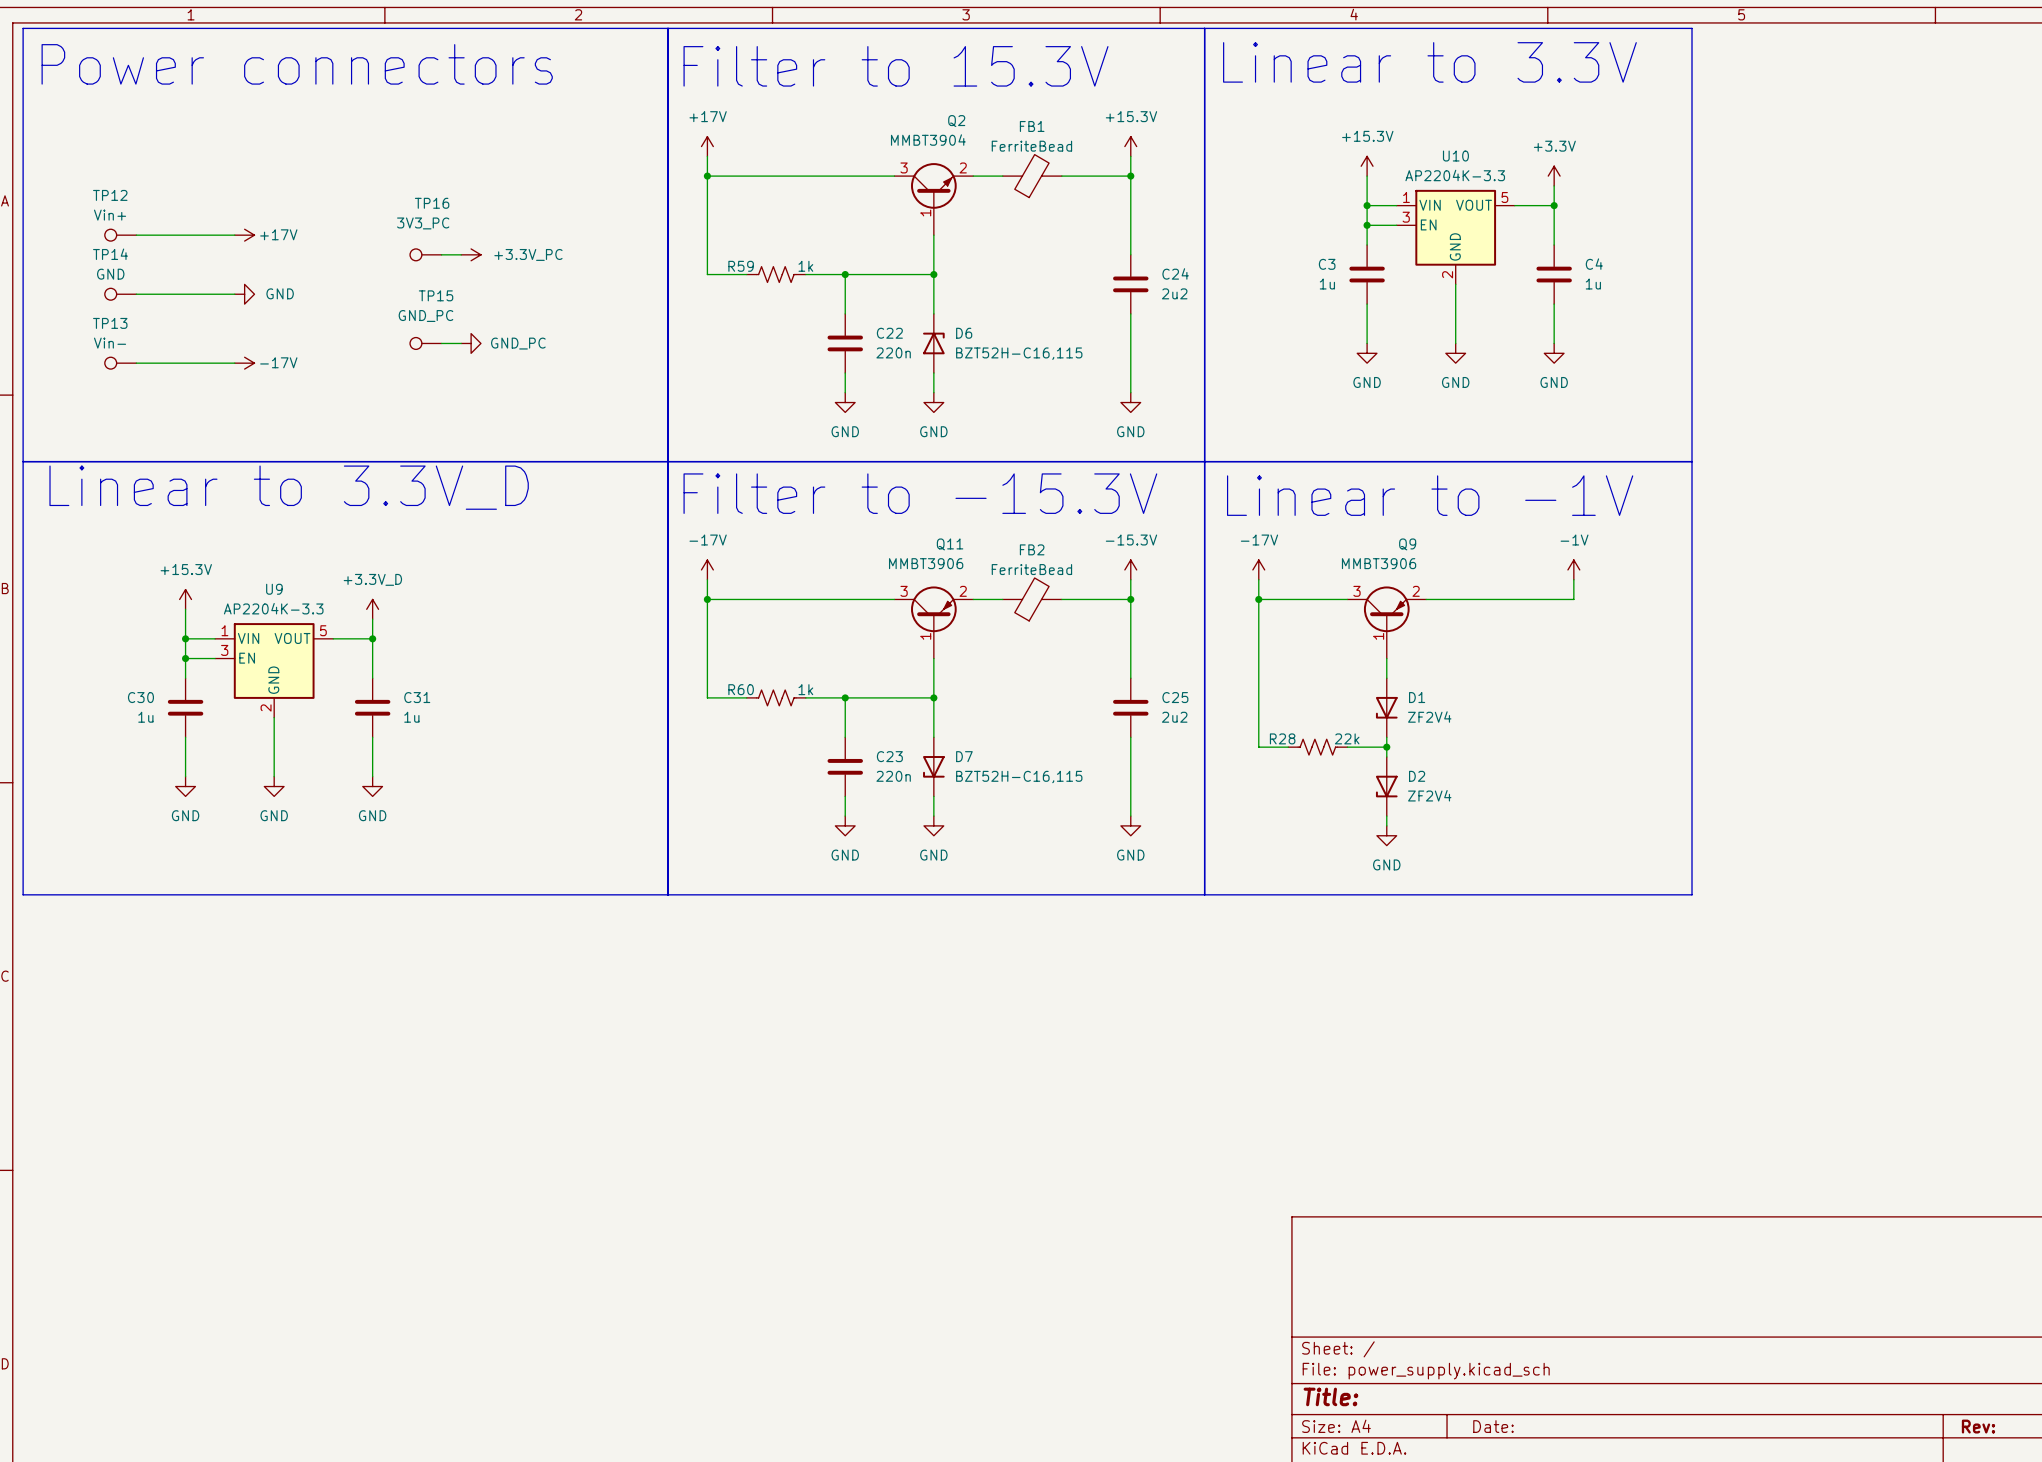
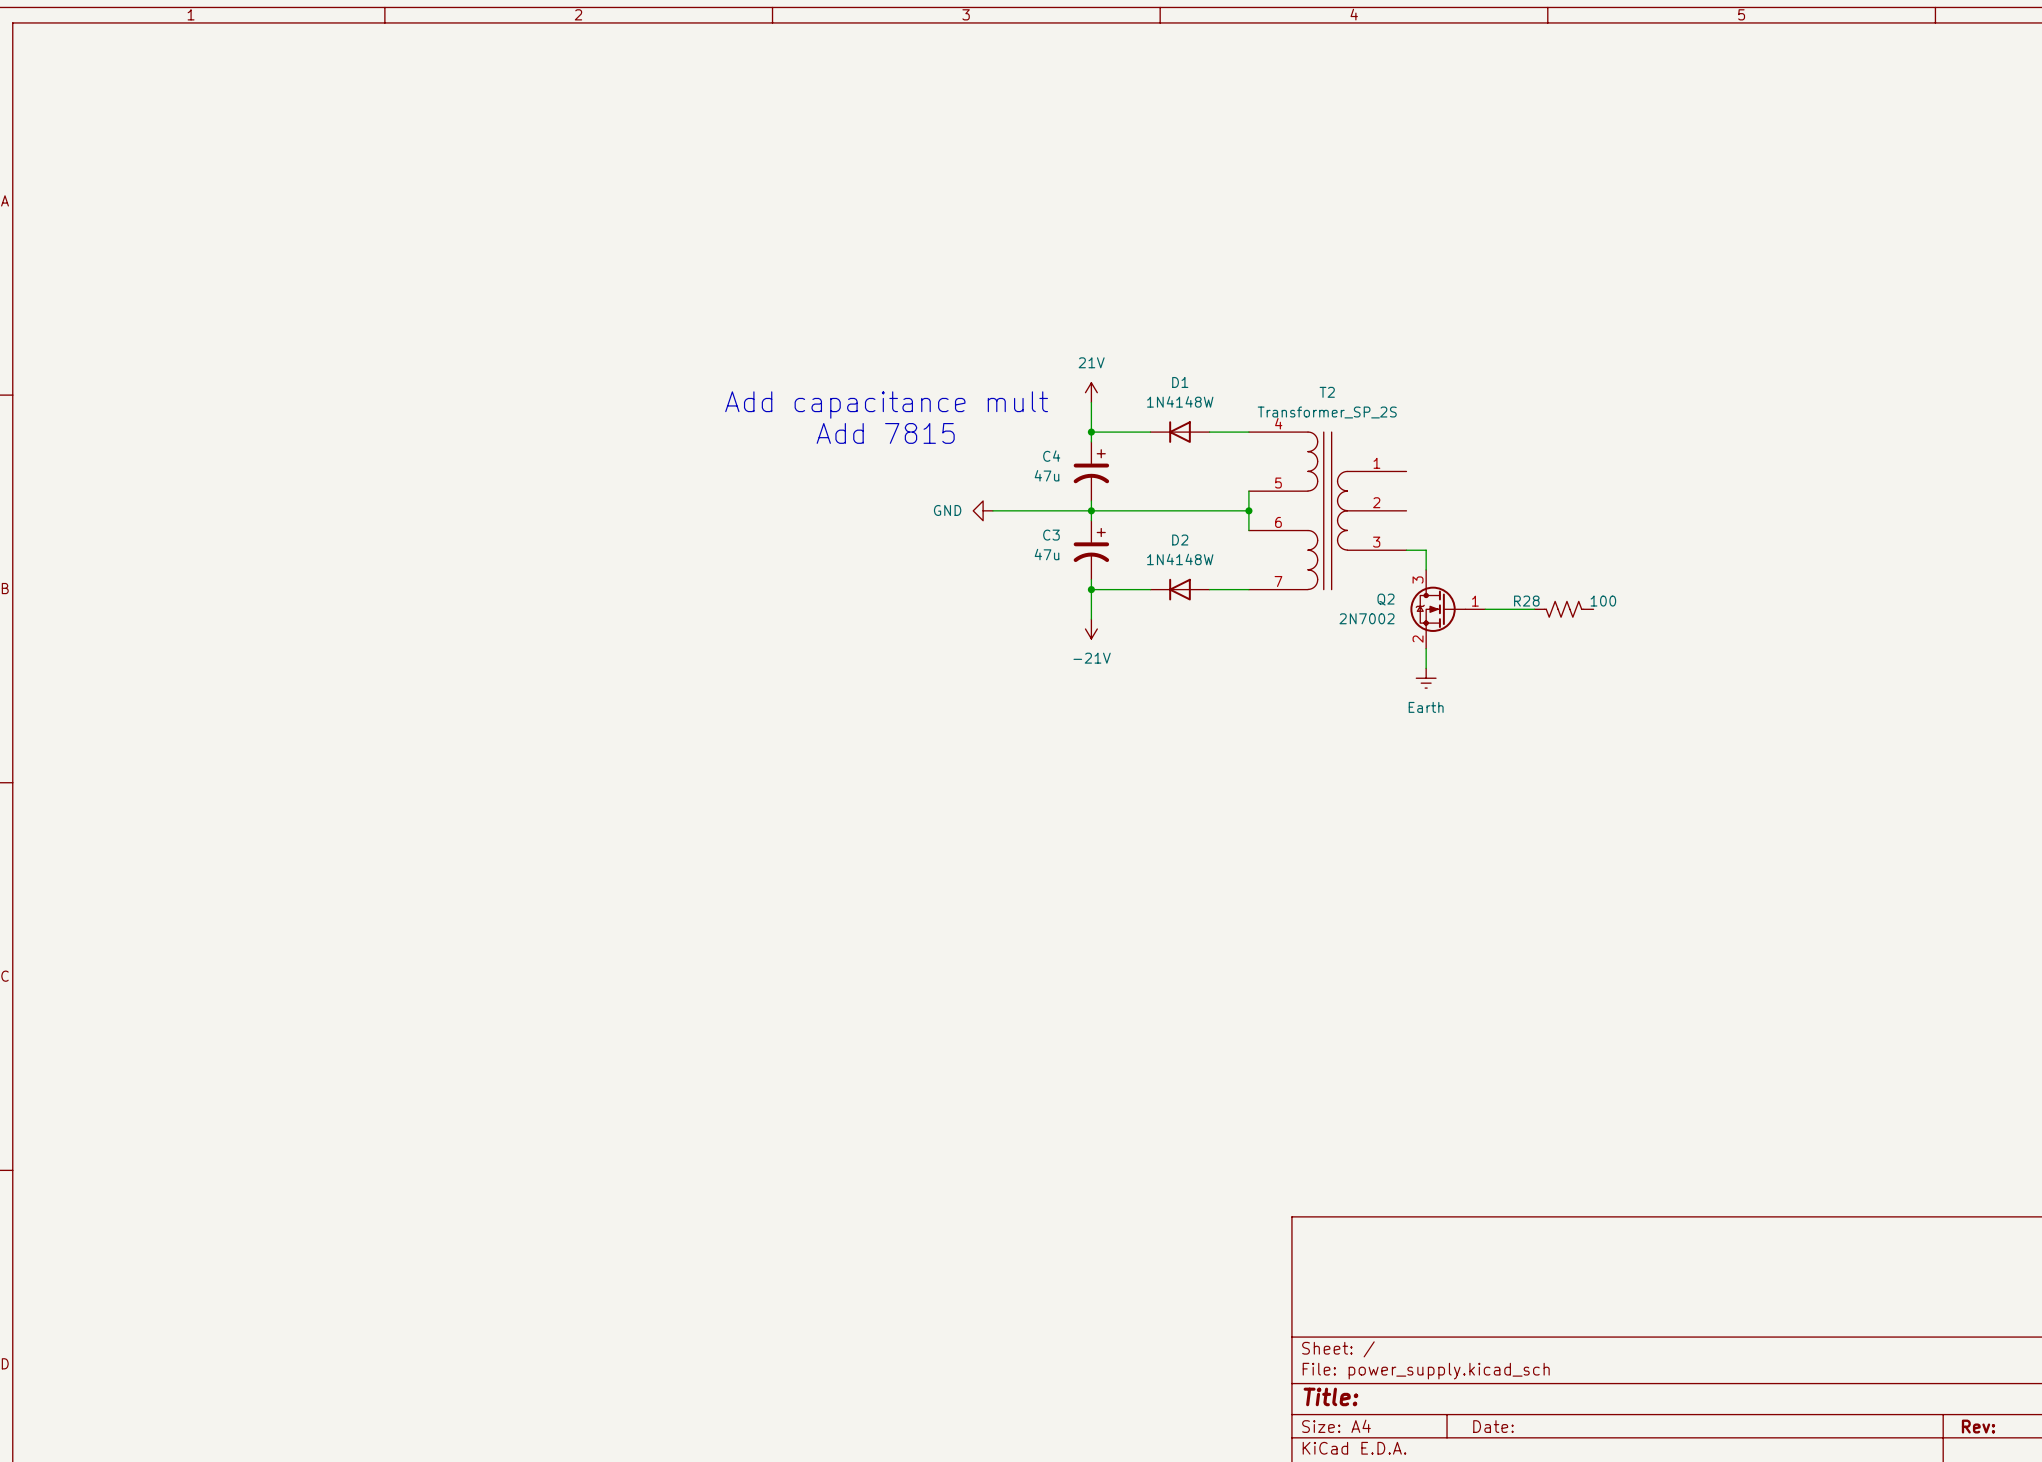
line: (668, 28) (668, 894) -> none
line: (1204, 28) (1204, 894) -> none
text: Linear to 3.3V (1429, 62) -> none
text: Power connectors (297, 64) -> none
text: Filter to 15.3V (896, 66) -> none
Q2 name position: Q2 (956, 121) -> Q2 (1386, 599)
Q2 value: MMBT3904 (928, 140) -> 2N7002 (1367, 618)
power symbol: +17V (707, 146) -> none
power symbol: +15.3V (1130, 146) -> none
wire: (707, 156) (707, 274) (746, 274) -> none
wire: (1130, 156) (1130, 254) -> none
Q2 symbol: [894, 163, 974, 236] -> [1410, 569, 1486, 649]
power symbol: +15.3V (1367, 166) -> none
wire: (707, 176) (894, 176) -> none
junction: (707, 176) -> none
wire: (973, 176) (1002, 176) -> none
FB1: FerriteBead (1032, 176) -> none
wire: (1061, 176) (1130, 176) -> none
junction: (1130, 176) -> none
wire: (1367, 176) (1367, 245) -> none
power symbol: +3.3V (1554, 176) -> none
wire: (1554, 185) (1554, 245) -> none
wire: (1367, 205) (1396, 205) -> none
junction: (1367, 205) -> none
wire: (1514, 205) (1554, 205) -> none
junction: (1554, 205) -> none
wire: (1367, 225) (1396, 225) -> none
junction: (1367, 225) -> none
TP12: Vin+ (120, 235) -> none
wire: (136, 235) (234, 235) -> none
power symbol: +17V (244, 235) -> none
wire: (933, 235) (933, 313) -> none
U10: AP2204K-3.3 (1455, 237) -> none
C3 symbol: [1349, 245, 1385, 305] -> [1073, 520, 1110, 580]
C4 symbol: [1536, 245, 1572, 305] -> [1073, 441, 1110, 502]
TP16: 3V3_PC (425, 254) -> none
wire: (441, 254) (461, 254) -> none
power symbol: +3.3V_PC (471, 254) -> none
C4 name position: C4 (1594, 264) -> C4 (1051, 456)
R59: 1k (776, 274) -> none
wire: (805, 274) (933, 274) -> none
wire: (845, 274) (845, 313) -> none
junction: (845, 274) -> none
junction: (933, 274) -> none
C24: 2u2 (1130, 284) -> none
C3 value: 1u (1327, 284) -> 47u (1047, 554)
wire: (1455, 284) (1455, 343) -> none
C4 value: 1u (1593, 284) -> 47u (1047, 475)
TP14: GND (120, 294) -> none
wire: (136, 294) (234, 294) -> none
power symbol: GND (244, 294) -> none
wire: (1367, 304) (1367, 343) -> none
wire: (1554, 304) (1554, 343) -> none
wire: (1130, 313) (1130, 392) -> none
TP15: GND_PC (425, 343) -> none
wire: (441, 343) (461, 343) -> none
power symbol: GND_PC (471, 343) -> none
C22: 220n (845, 343) -> none
D6: BZT52H-C16,115 (933, 343) -> none
power symbol: GND (1367, 353) -> none
power symbol: GND (1455, 353) -> none
power symbol: GND (1554, 353) -> none
TP13: Vin- (120, 363) -> none
wire: (136, 363) (234, 363) -> none
power symbol: -17V (244, 363) -> none
wire: (845, 373) (845, 392) -> none
wire: (933, 373) (933, 392) -> none
power symbol: none -> 21V (1091, 392)
power symbol: GND (845, 402) -> none
power symbol: GND (933, 402) -> none
wire: none -> (1091, 402) (1091, 441)
power symbol: GND (1130, 402) -> none
text: none -> Add capacitance mult (886, 405)
wire: none -> (1091, 432) (1150, 432)
junction: none -> (1091, 432)
wire: none -> (1209, 432) (1248, 432)
text: none -> Add 7815 (885, 433)
line: (23, 461) (1692, 461) -> none
line: (23, 461) (23, 28) (1692, 28) (1692, 894) (23, 894) (23, 461) -> none
text: Linear to 3.3V_D (289, 487) -> none
wire: none -> (1248, 491) (1248, 530)
text: Filter to -15.3V (920, 493) -> none
text: Linear to -1V (1430, 495) -> none
wire: none -> (1091, 501) (1091, 520)
power symbol: none -> GND (983, 510)
wire: none -> (992, 510) (1248, 510)
junction: none -> (1091, 510)
junction: none -> (1248, 510)
T2: none -> Transformer_SP_2S (1327, 510)
wire: none -> (1406, 550) (1426, 550) (1426, 569)
power symbol: -17V (707, 569) -> none
power symbol: -15.3V (1130, 569) -> none
power symbol: -17V (1258, 569) -> none
power symbol: -1V (1573, 569) -> none
wire: (707, 579) (707, 697) (746, 697) -> none
wire: none -> (1091, 579) (1091, 619)
wire: (1130, 579) (1130, 678) -> none
wire: (1258, 579) (1258, 747) (1288, 747) -> none
wire: (1573, 579) (1573, 599) (1426, 599) -> none
wire: none -> (1091, 589) (1150, 589)
wire: none -> (1209, 589) (1248, 589)
power symbol: +15.3V (185, 599) -> none
wire: (707, 599) (894, 599) -> none
junction: (707, 599) -> none
wire: (973, 599) (1002, 599) -> none
FB2: FerriteBead (1032, 599) -> none
wire: (1061, 599) (1130, 599) -> none
junction position: (1130, 599) -> (1091, 589)
wire: (1258, 599) (1347, 599) -> none
junction: (1258, 599) -> none
wire: (185, 609) (185, 678) -> none
power symbol: +3.3V_D (372, 609) -> none
wire: none -> (1485, 609) (1534, 609)
wire: (372, 619) (372, 678) -> none
Q11: MMBT3906 (933, 622) -> none
Q9: MMBT3906 (1386, 622) -> none
power symbol: none -> -21V (1091, 629)
wire: (185, 638) (215, 638) -> none
junction: (185, 638) -> none
wire: (333, 638) (372, 638) -> none
junction: (372, 638) -> none
wire: (185, 658) (215, 658) -> none
junction: (185, 658) -> none
wire: (933, 658) (933, 737) -> none
wire: (1386, 658) (1386, 678) -> (1426, 648) (1426, 668)
U9: AP2204K-3.3 (274, 670) -> none
D1 symbol: [1375, 678, 1398, 738] -> [1150, 421, 1210, 443]
power symbol: none -> Earth (1426, 678)
R60: 1k (776, 697) -> none
wire: (805, 697) (933, 697) -> none
wire: (845, 697) (845, 737) -> none
junction: (845, 697) -> none
junction: (933, 697) -> none
D1 name position: D1 (1417, 697) -> D1 (1180, 382)
C30: 1u (185, 707) -> none
C31: 1u (372, 707) -> none
C25: 2u2 (1130, 707) -> none
wire: (274, 717) (274, 776) -> none
D1 value: ZF2V4 (1429, 717) -> 1N4148W (1180, 401)
wire: (185, 737) (185, 776) -> none
wire: (372, 737) (372, 776) -> none
wire: (1130, 737) (1130, 816) -> none
wire: (1386, 737) (1386, 756) -> none
R28 value: 22k (1347, 738) -> 100 (1603, 601)
R28 flip: as is (1317, 747) -> left-right (1564, 609)
R28 position: (1317, 747) -> (1564, 609)
wire: (1347, 747) (1386, 747) -> none
junction: (1386, 747) -> none
D2 symbol: [1375, 756, 1398, 817] -> [1150, 578, 1210, 601]
C23: 220n (845, 766) -> none
D7: BZT52H-C16,115 (933, 766) -> none
D2 name position: D2 (1417, 776) -> D2 (1180, 540)
power symbol: GND (185, 786) -> none
power symbol: GND (274, 786) -> none
power symbol: GND (372, 786) -> none
D2 value: ZF2V4 (1429, 795) -> 1N4148W (1180, 559)
wire: (845, 796) (845, 816) -> none
wire: (933, 796) (933, 816) -> none
wire: (1386, 816) (1386, 825) -> none
power symbol: GND (845, 825) -> none
power symbol: GND (933, 825) -> none
power symbol: GND (1130, 825) -> none
power symbol: GND (1386, 835) -> none

